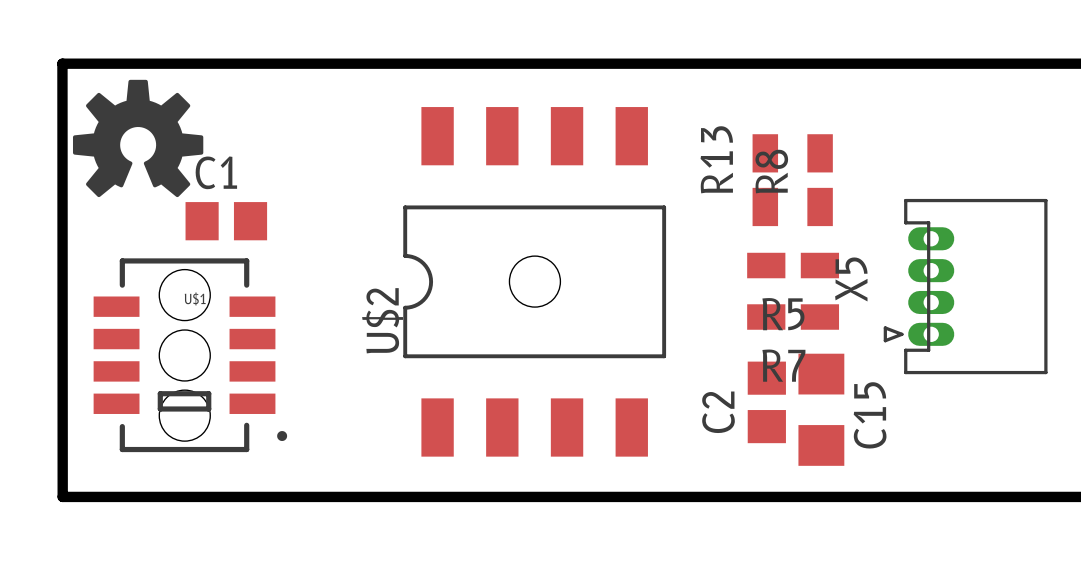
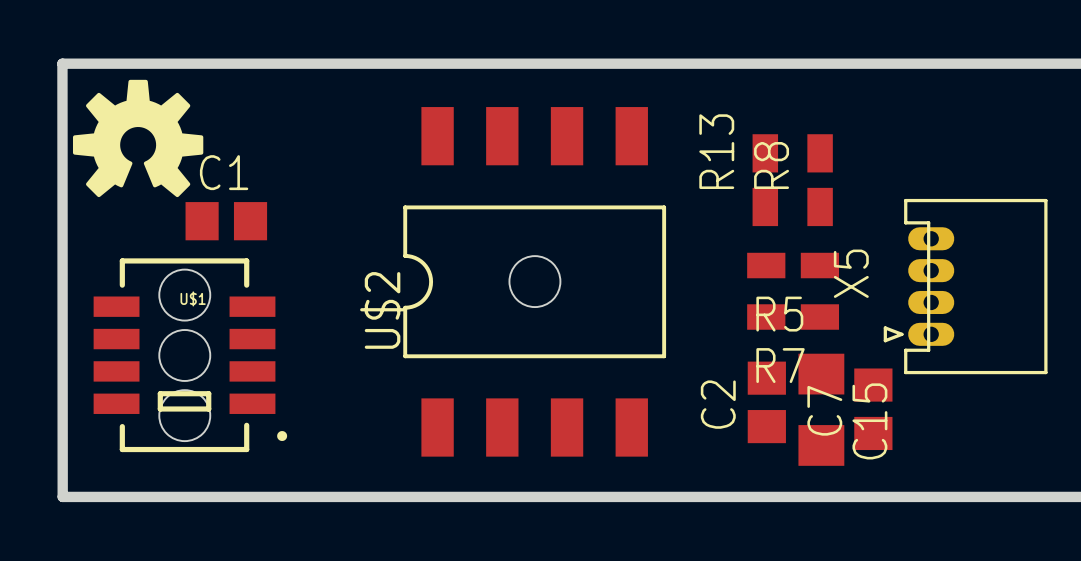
C7: none -> (873, 409)

